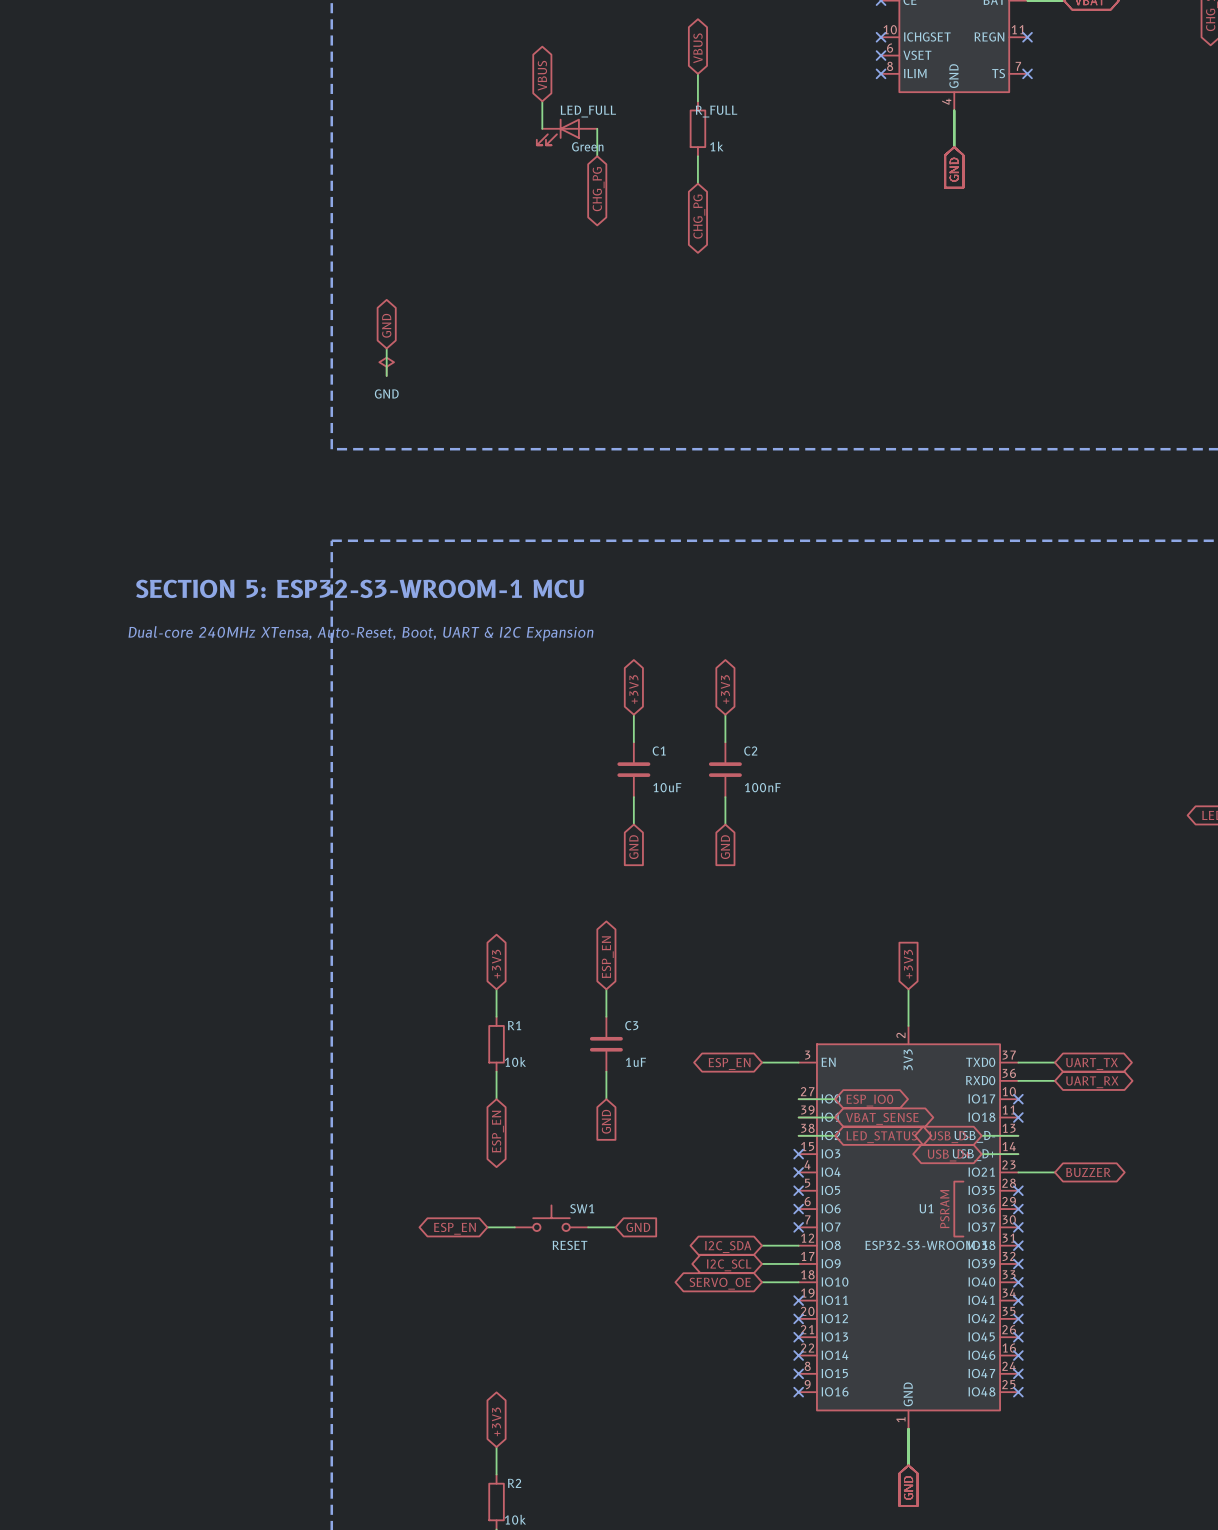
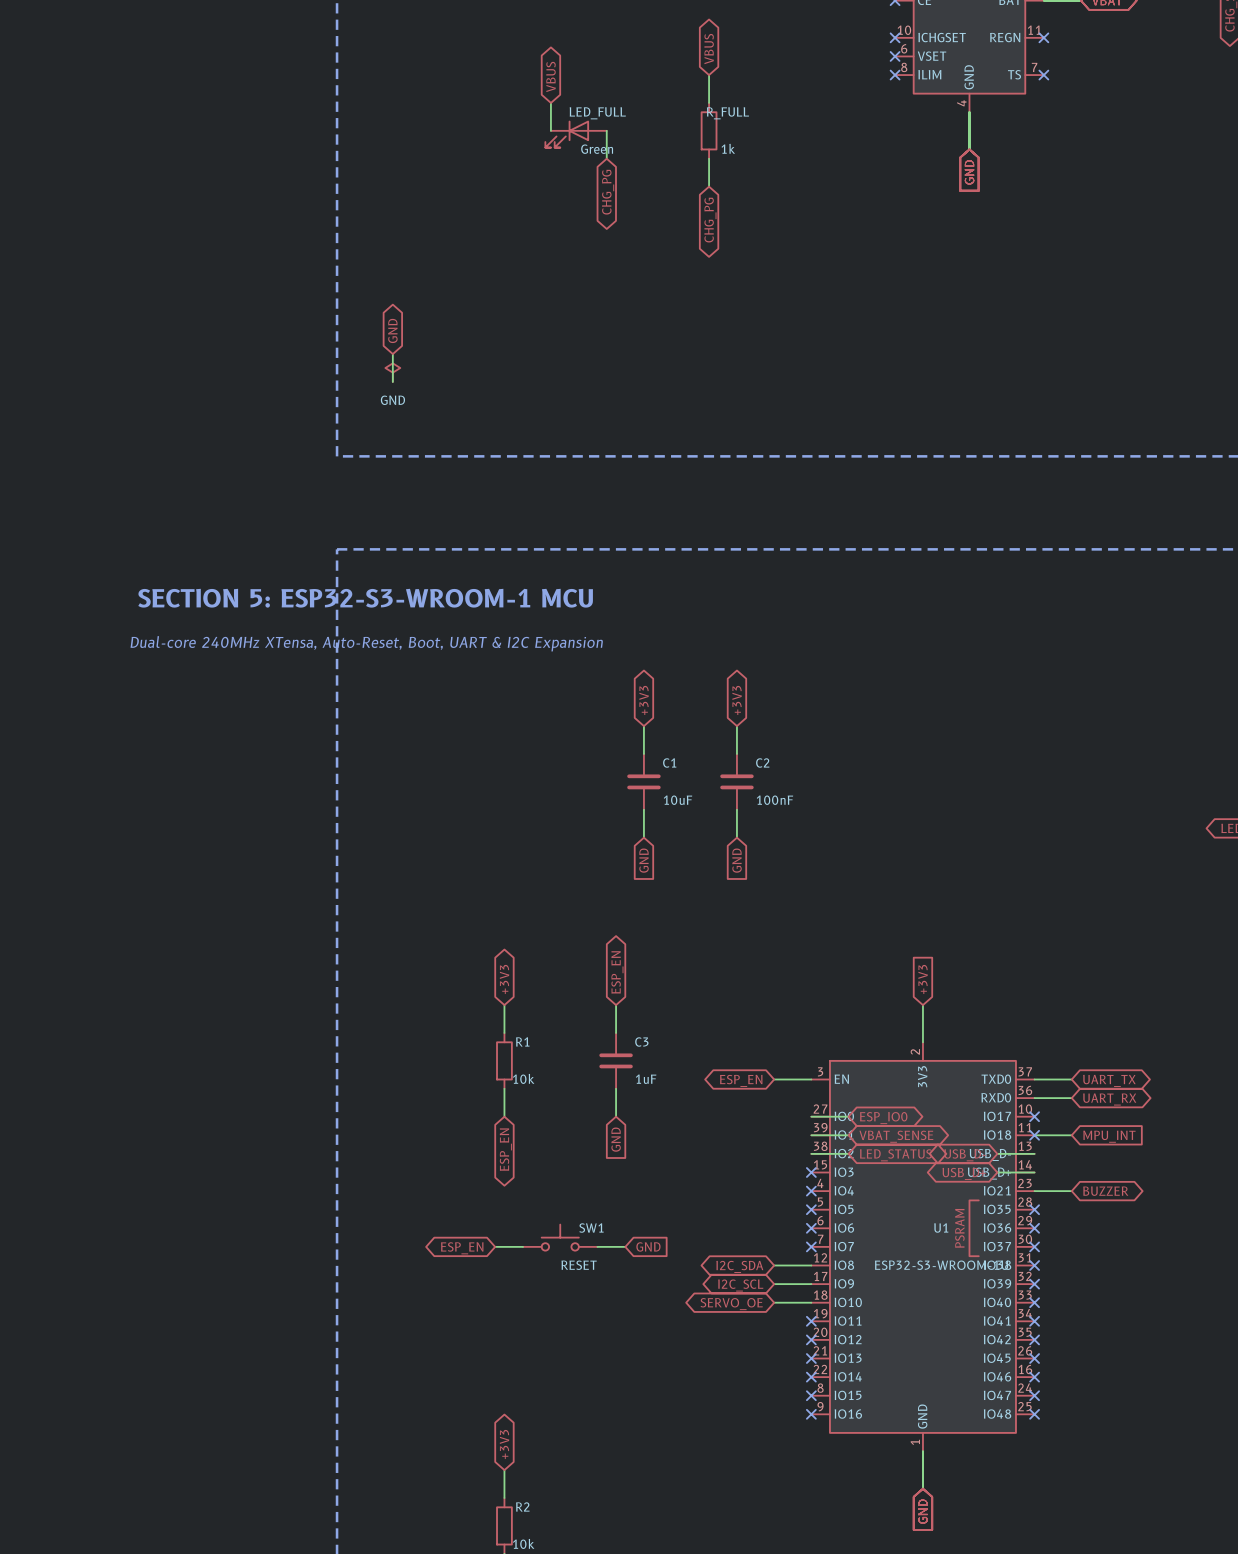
wire: none -> (1034, 1135) (1071, 1135)
global label: none -> MPU_INT (1109, 1136)
U1 value: ESP32-S3-WROOM-1 (926, 1245) -> ESP32-S3-WROOM-1U (941, 1265)

